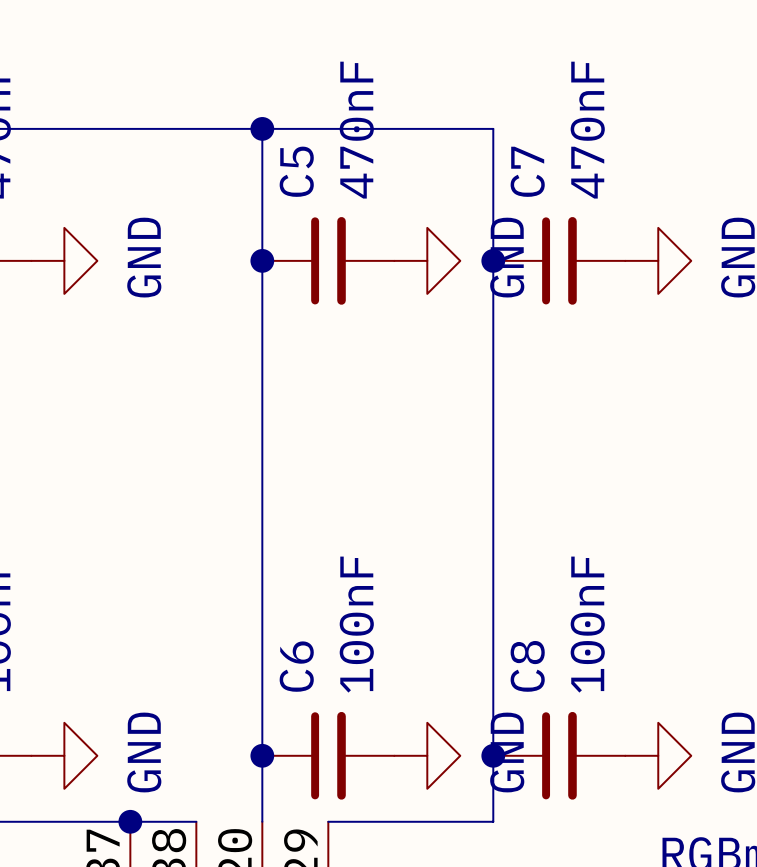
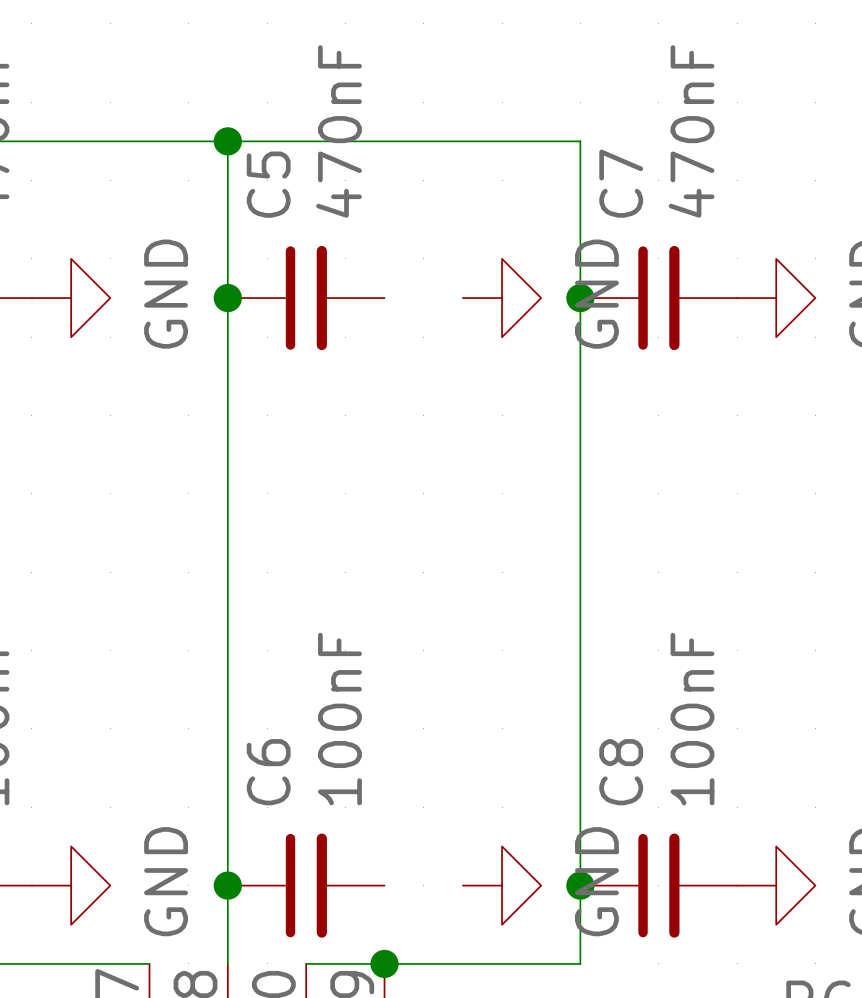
wire: (262, 128) (262, 821) -> (384, 963) (306, 963)
junction position: (262, 128) -> (227, 141)
junction position: (262, 260) -> (227, 298)
C5 position: (328, 260) -> (306, 298)
junction: none -> (227, 885)
junction: (262, 755) -> none
C6 position: (328, 755) -> (306, 885)
wire: (130, 821) (196, 821) -> (227, 141) (227, 963)
junction: (130, 821) -> none
junction: none -> (384, 963)

